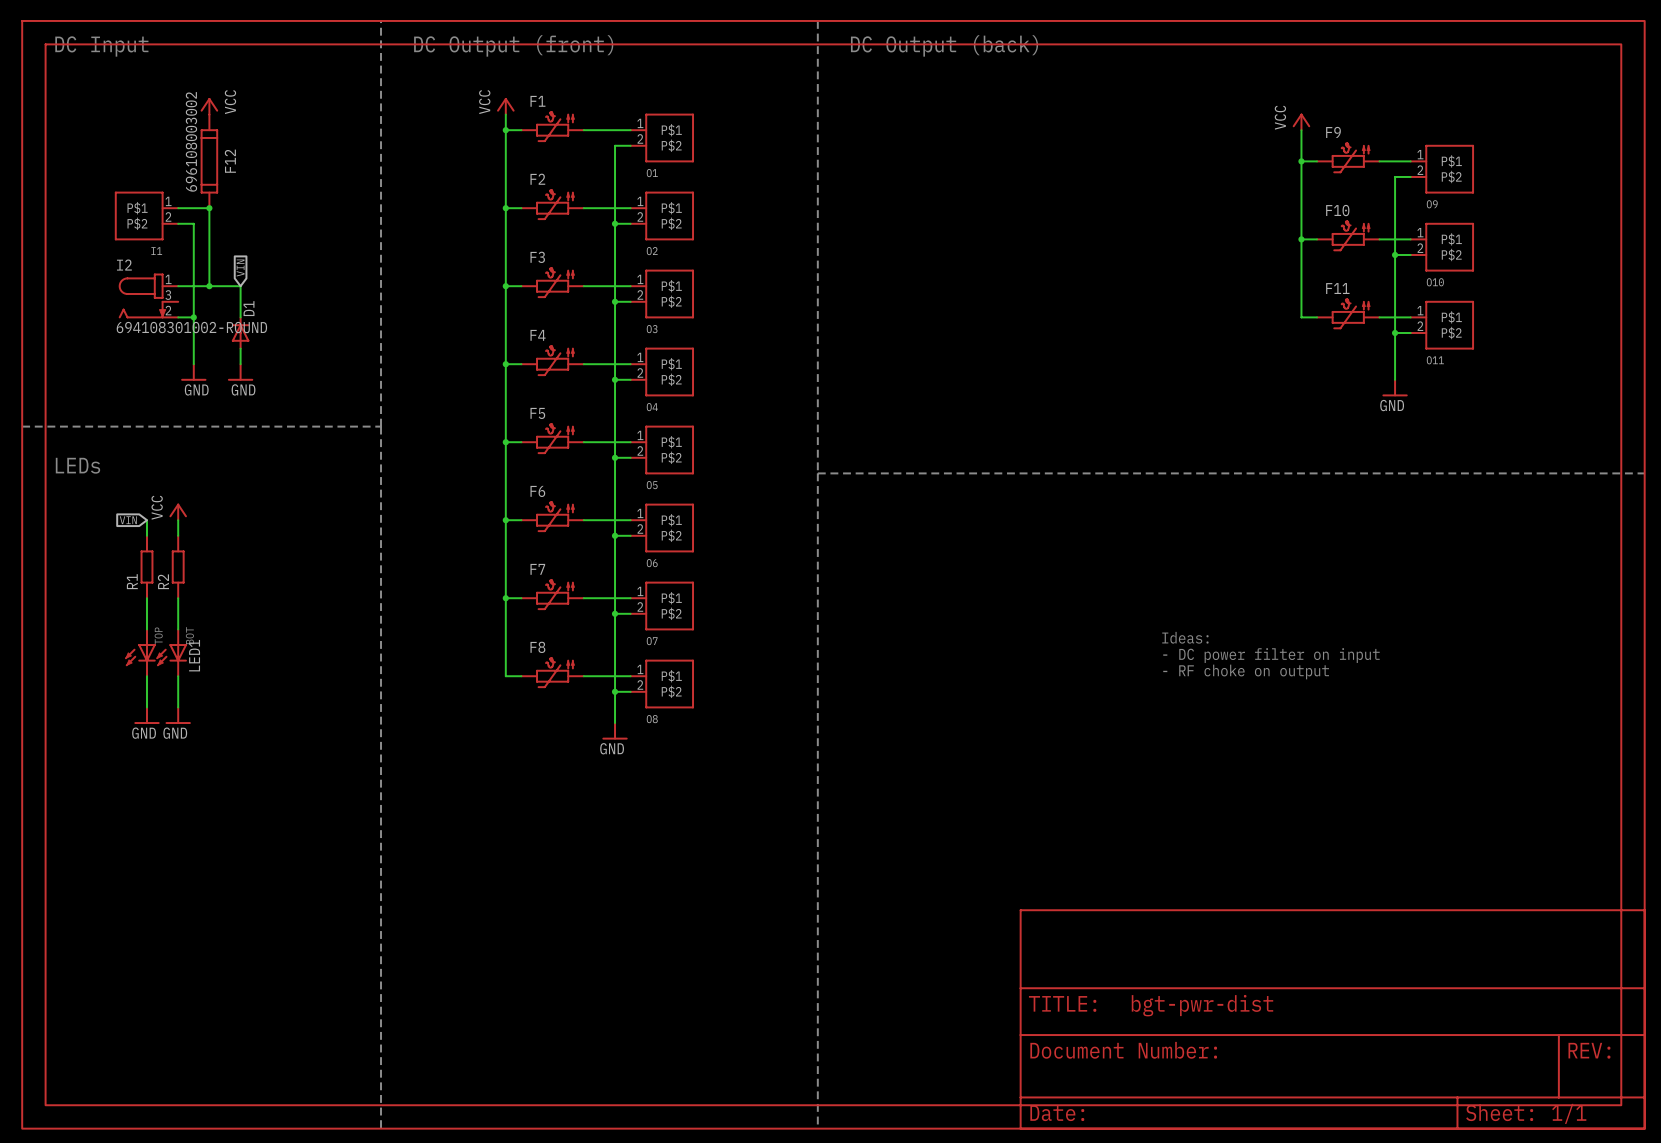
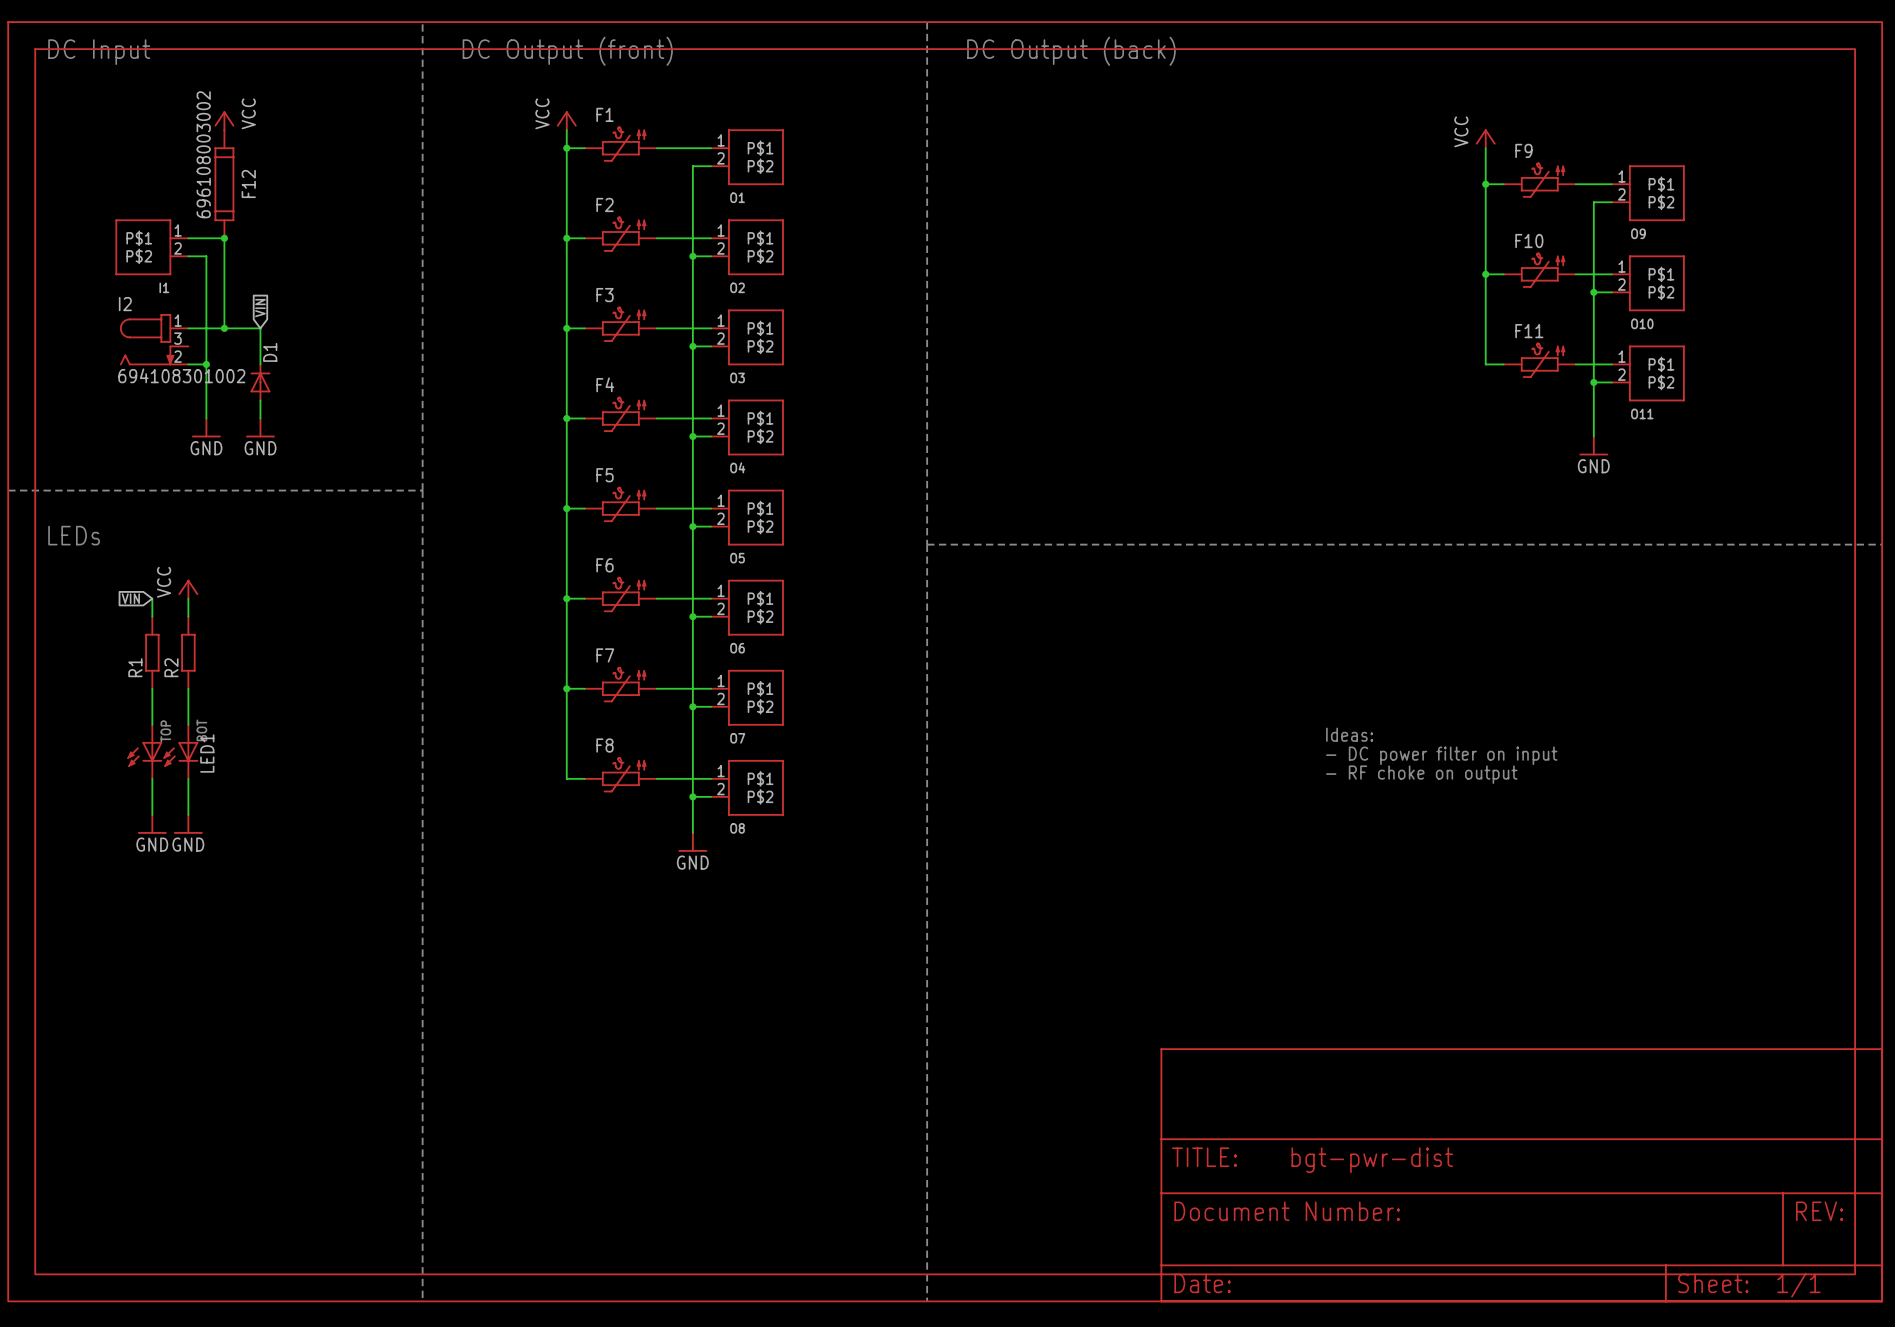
I2 value: 694108301002-ROUND (191, 327) -> 694108301002 (181, 375)

